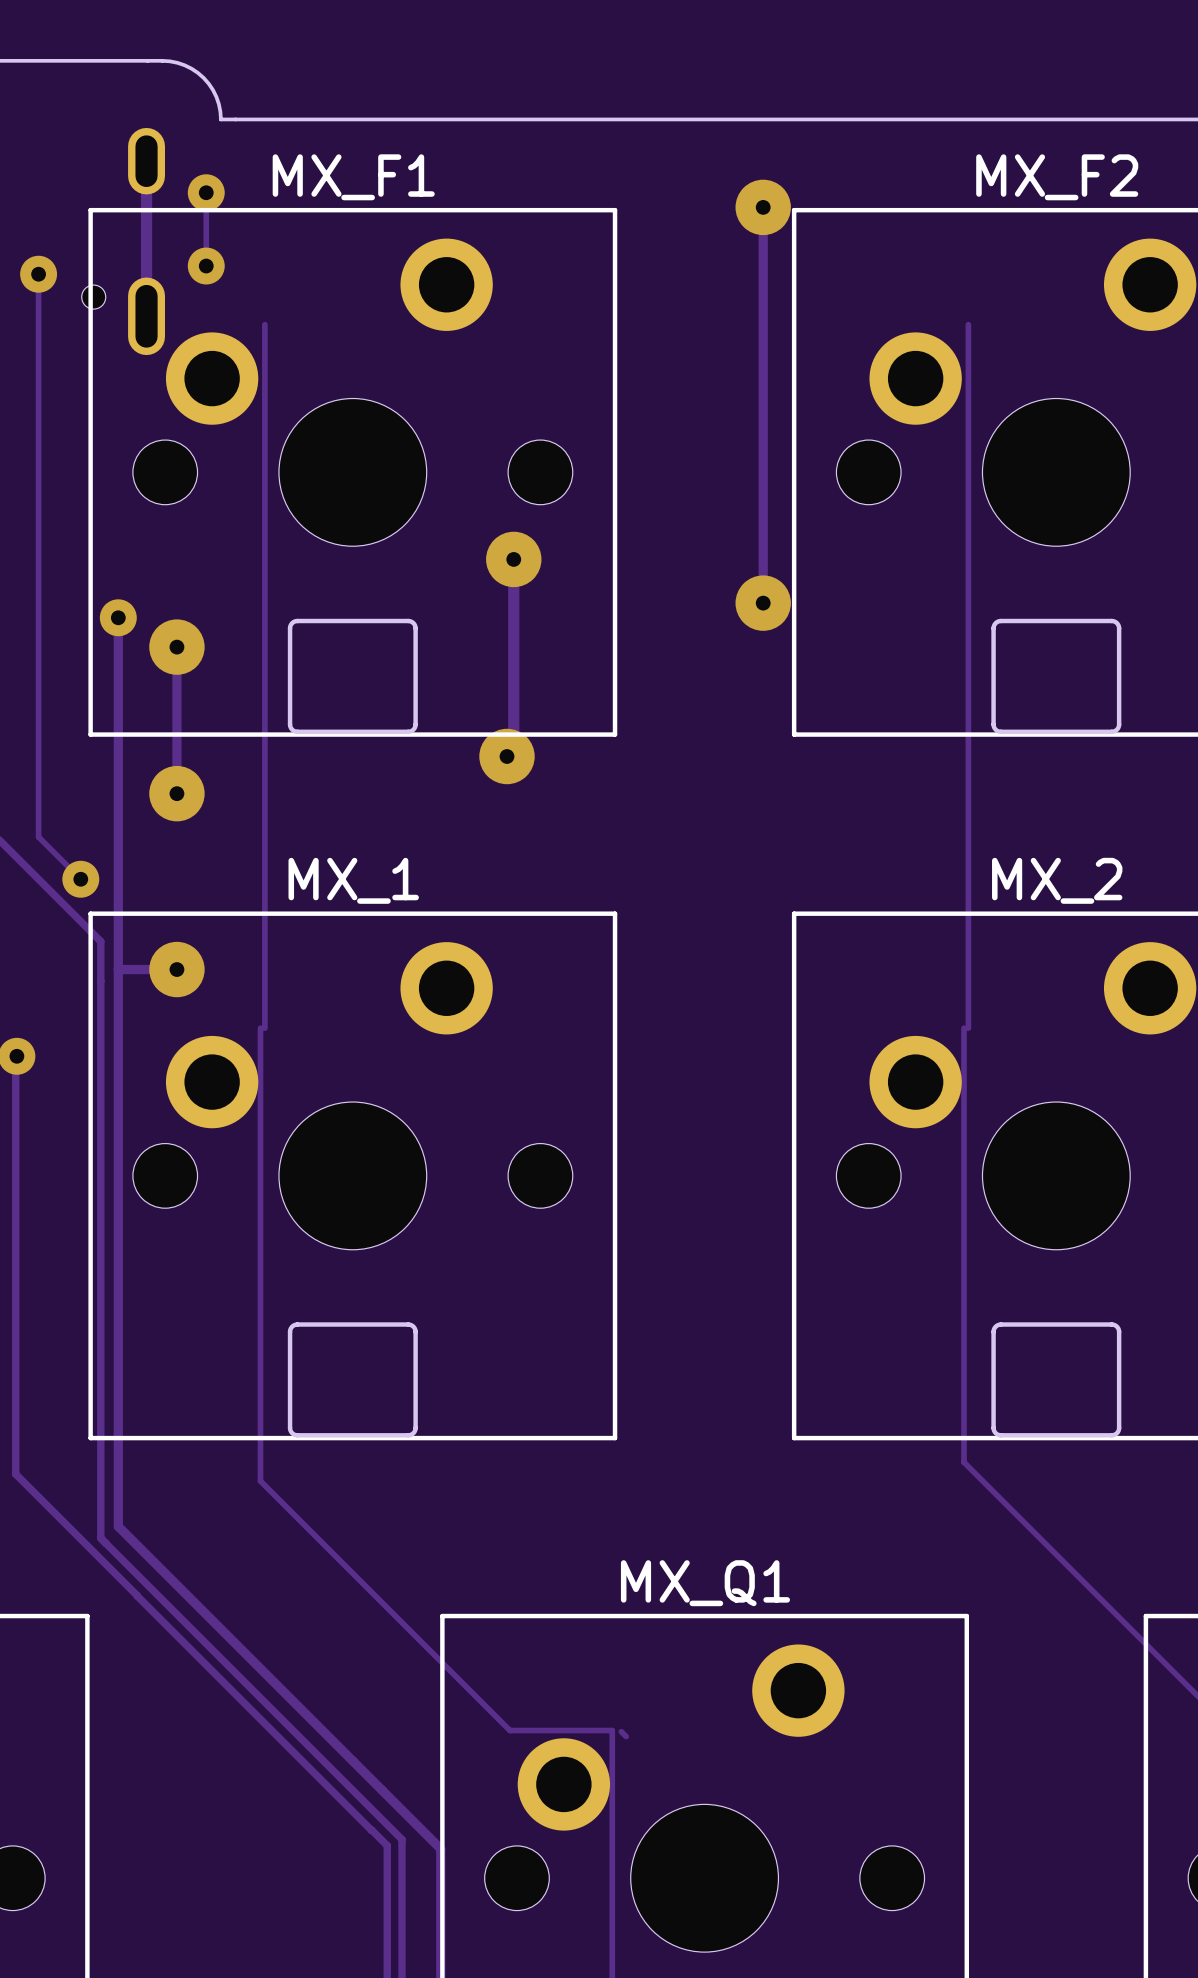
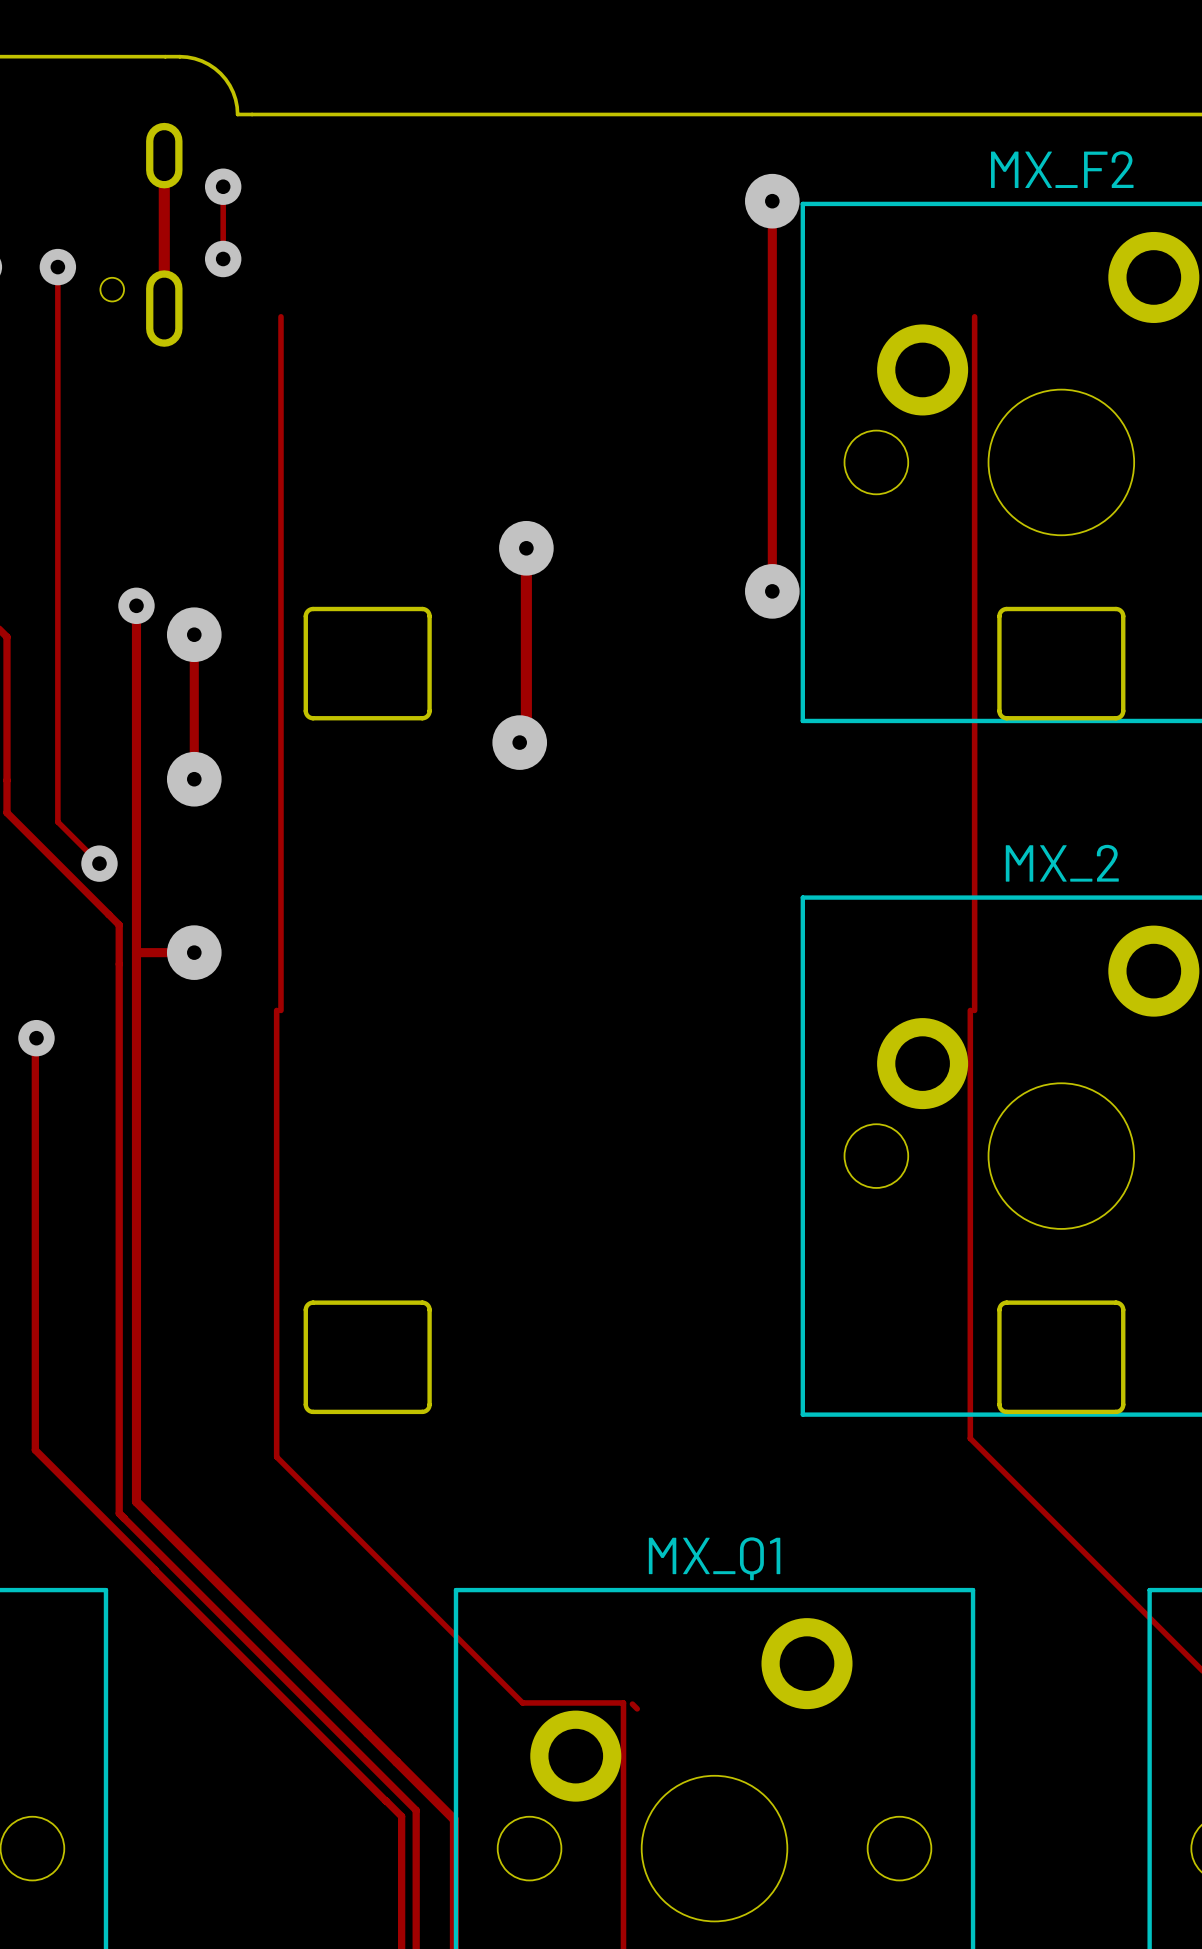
MX_F1: (352, 472) -> none
MX_1: (352, 1175) -> none

